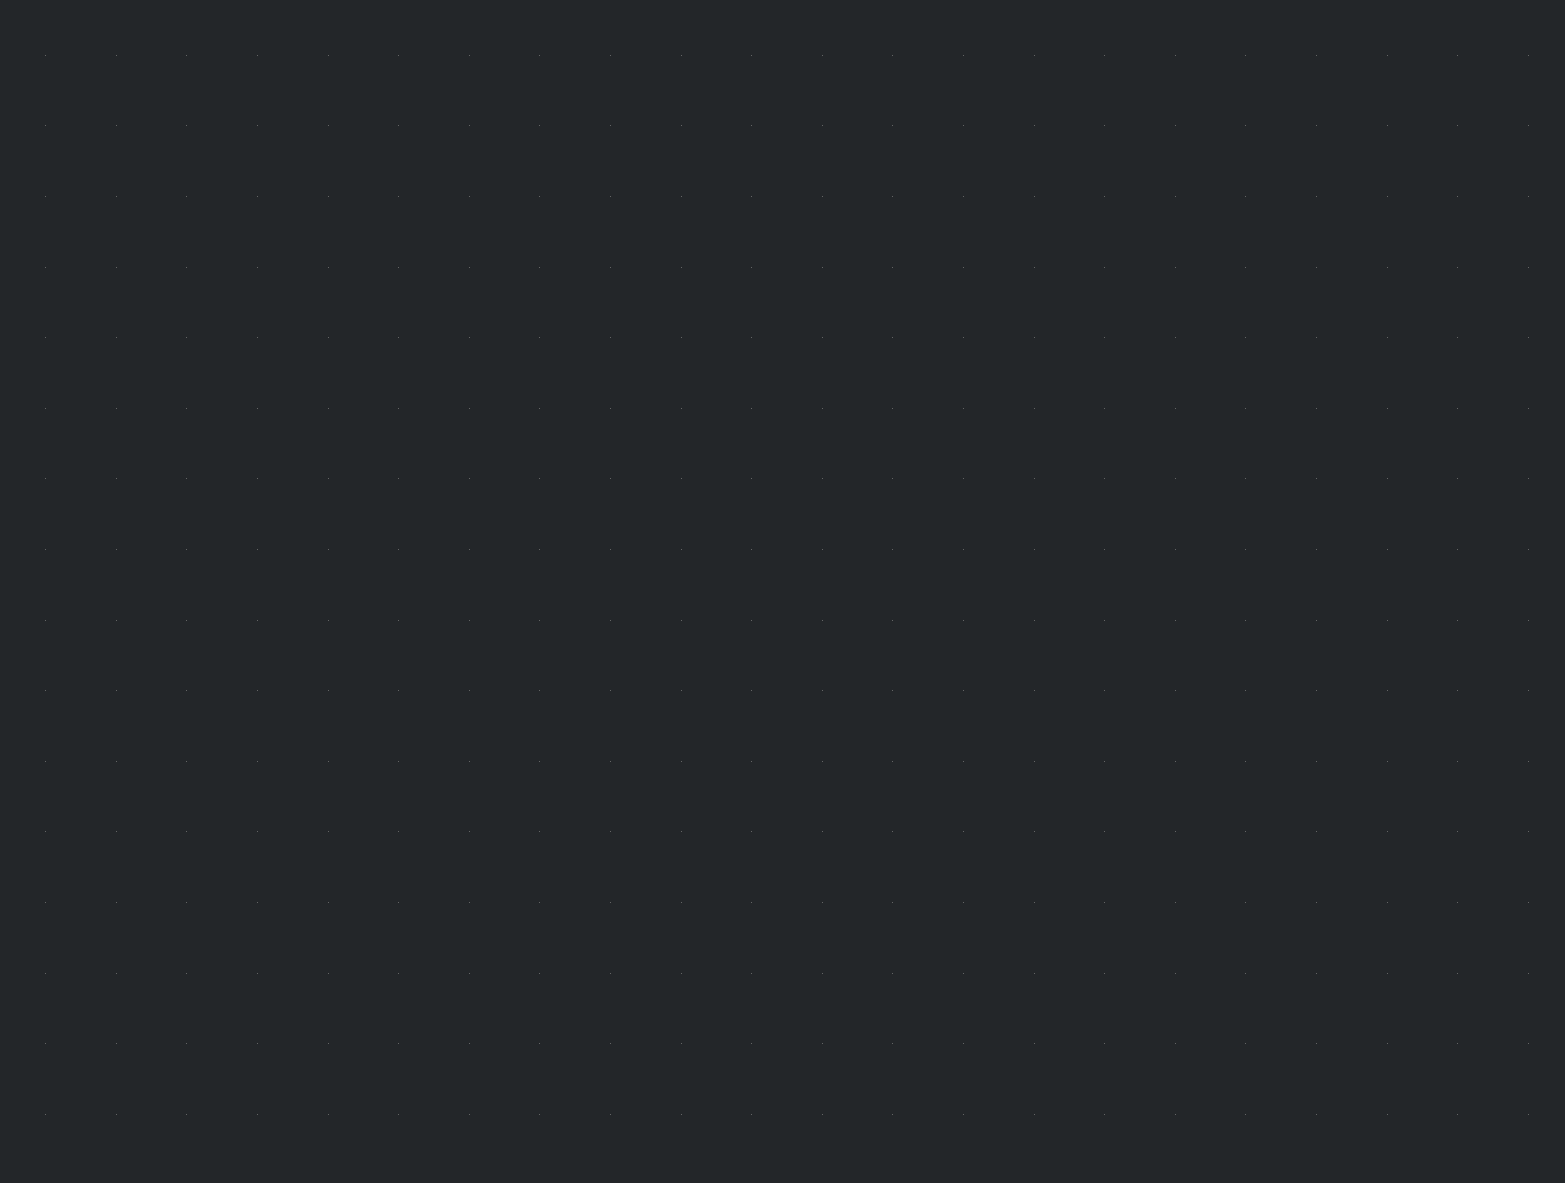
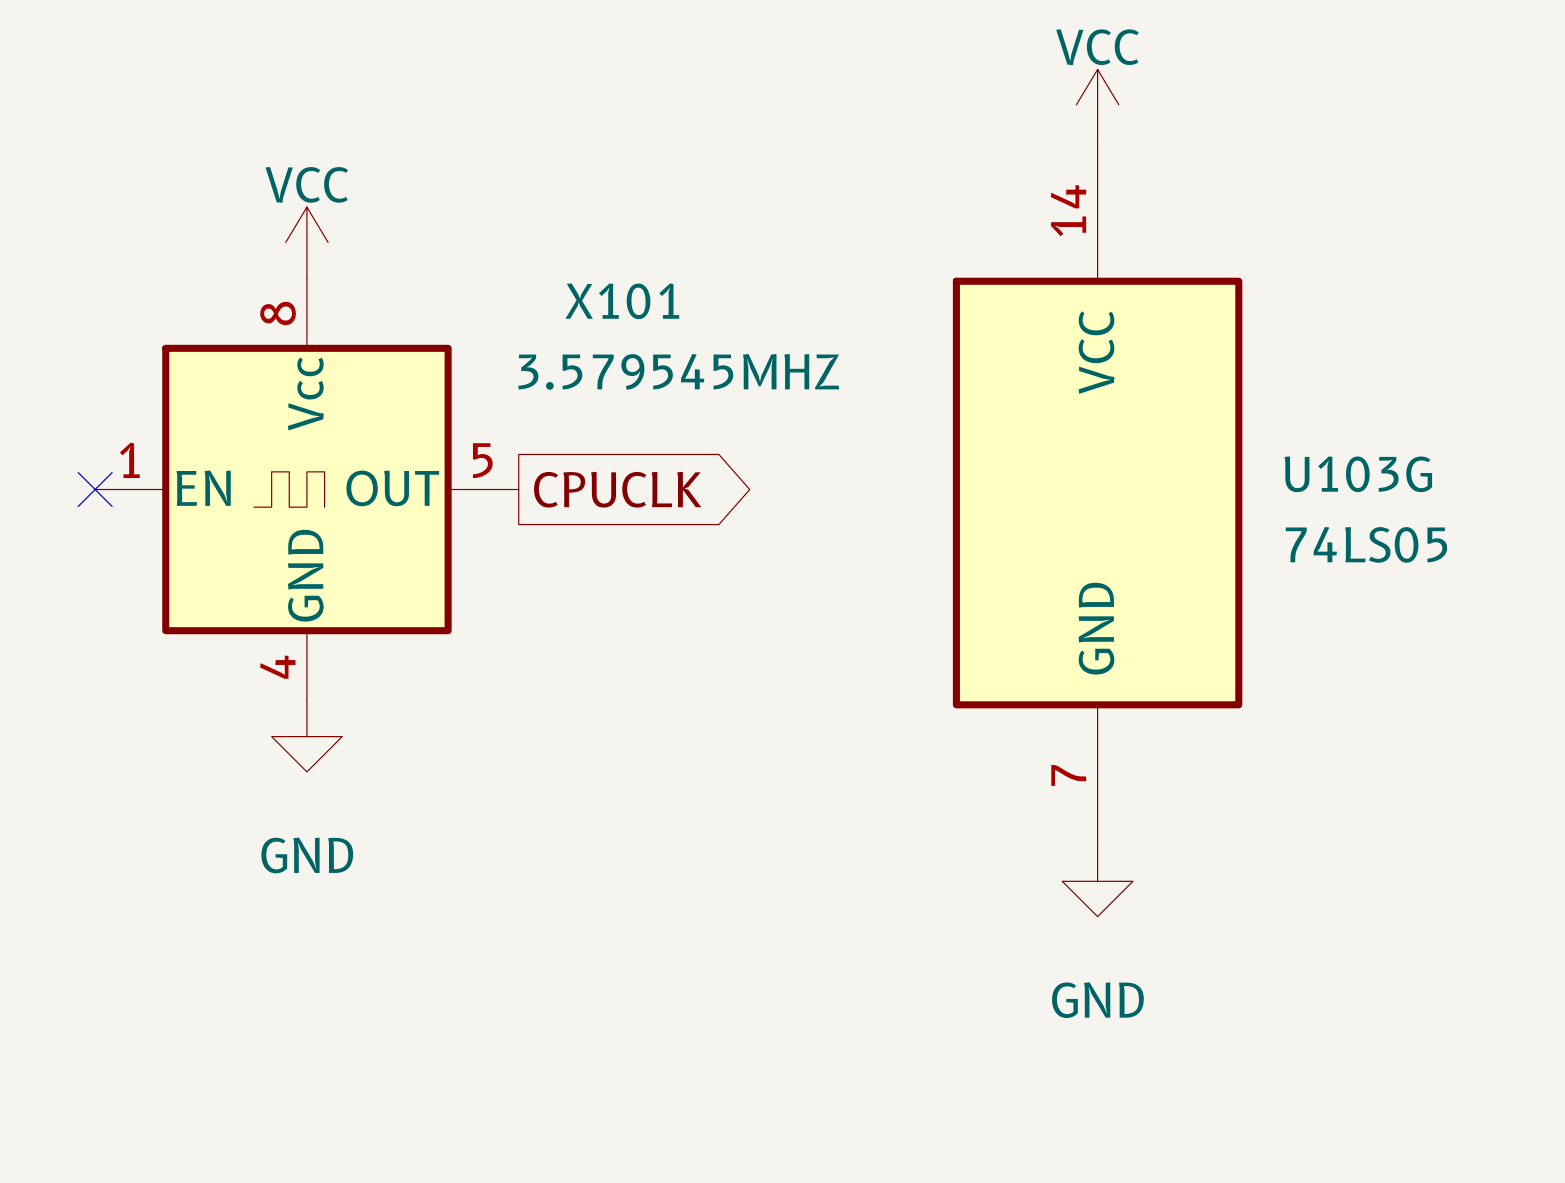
power symbol: none -> VCC (1097, 104)
power symbol: none -> VCC (306, 242)
no-connect mark: none -> (95, 489)
X101: none -> 3.579545MHZ (306, 489)
global label: none -> CPUCLK (617, 489)
U103G: none -> 74LS05 (1097, 493)
power symbol: none -> GND (306, 736)
power symbol: none -> GND (1097, 881)

